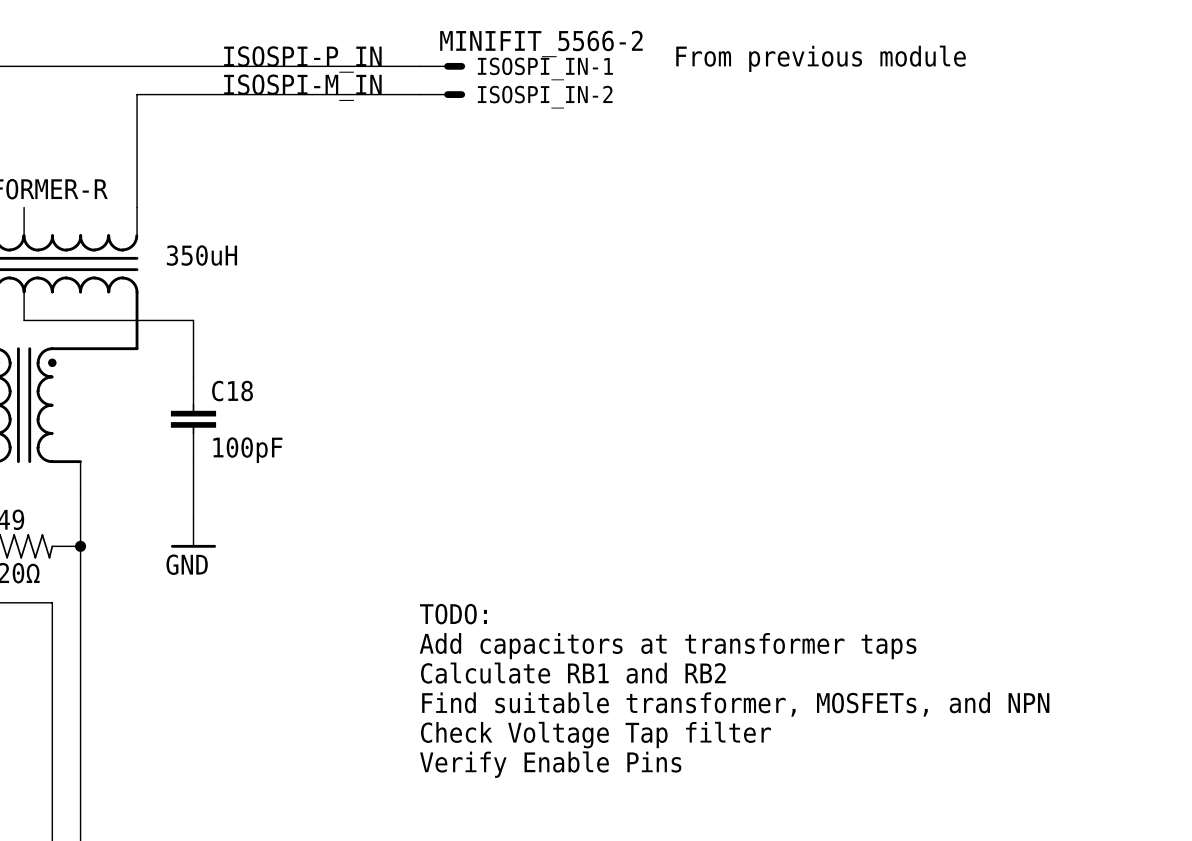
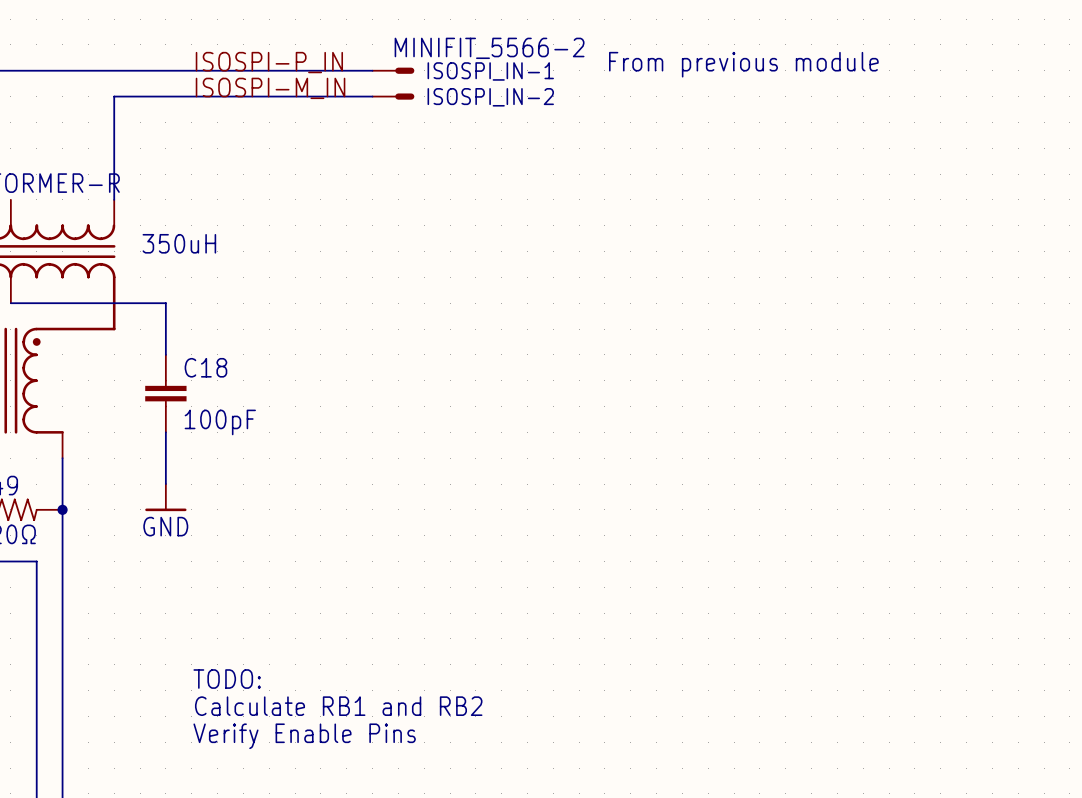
text position: TODO: (453, 614) -> TODO: (227, 679)
text: Add capacitors at transformer taps (668, 646) -> none
text position: Calculate RB1 and RB2 (573, 673) -> Calculate RB1 and RB2 (338, 706)
text: Find suitable transformer, MOSFETs, and NPN (735, 704) -> none
text: Check Voltage Tap filter (596, 735) -> none
text position: Verify Enable Pins (550, 764) -> Verify Enable Pins (304, 736)

